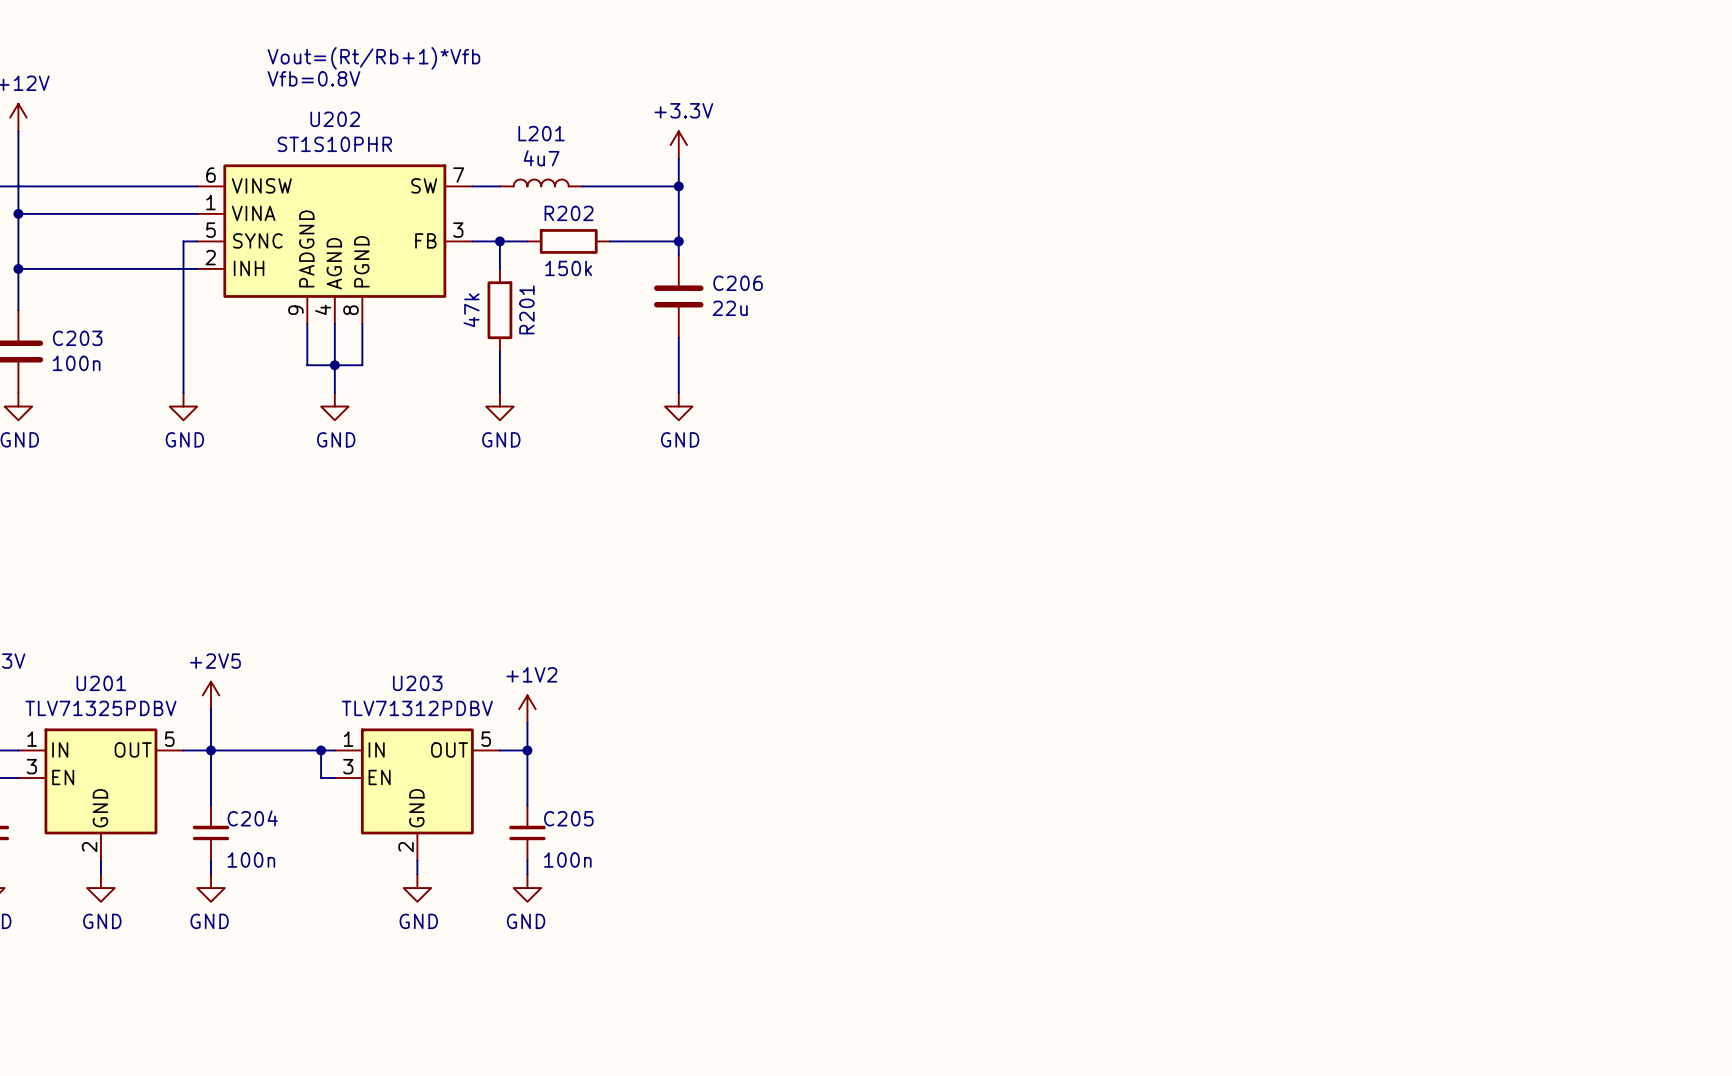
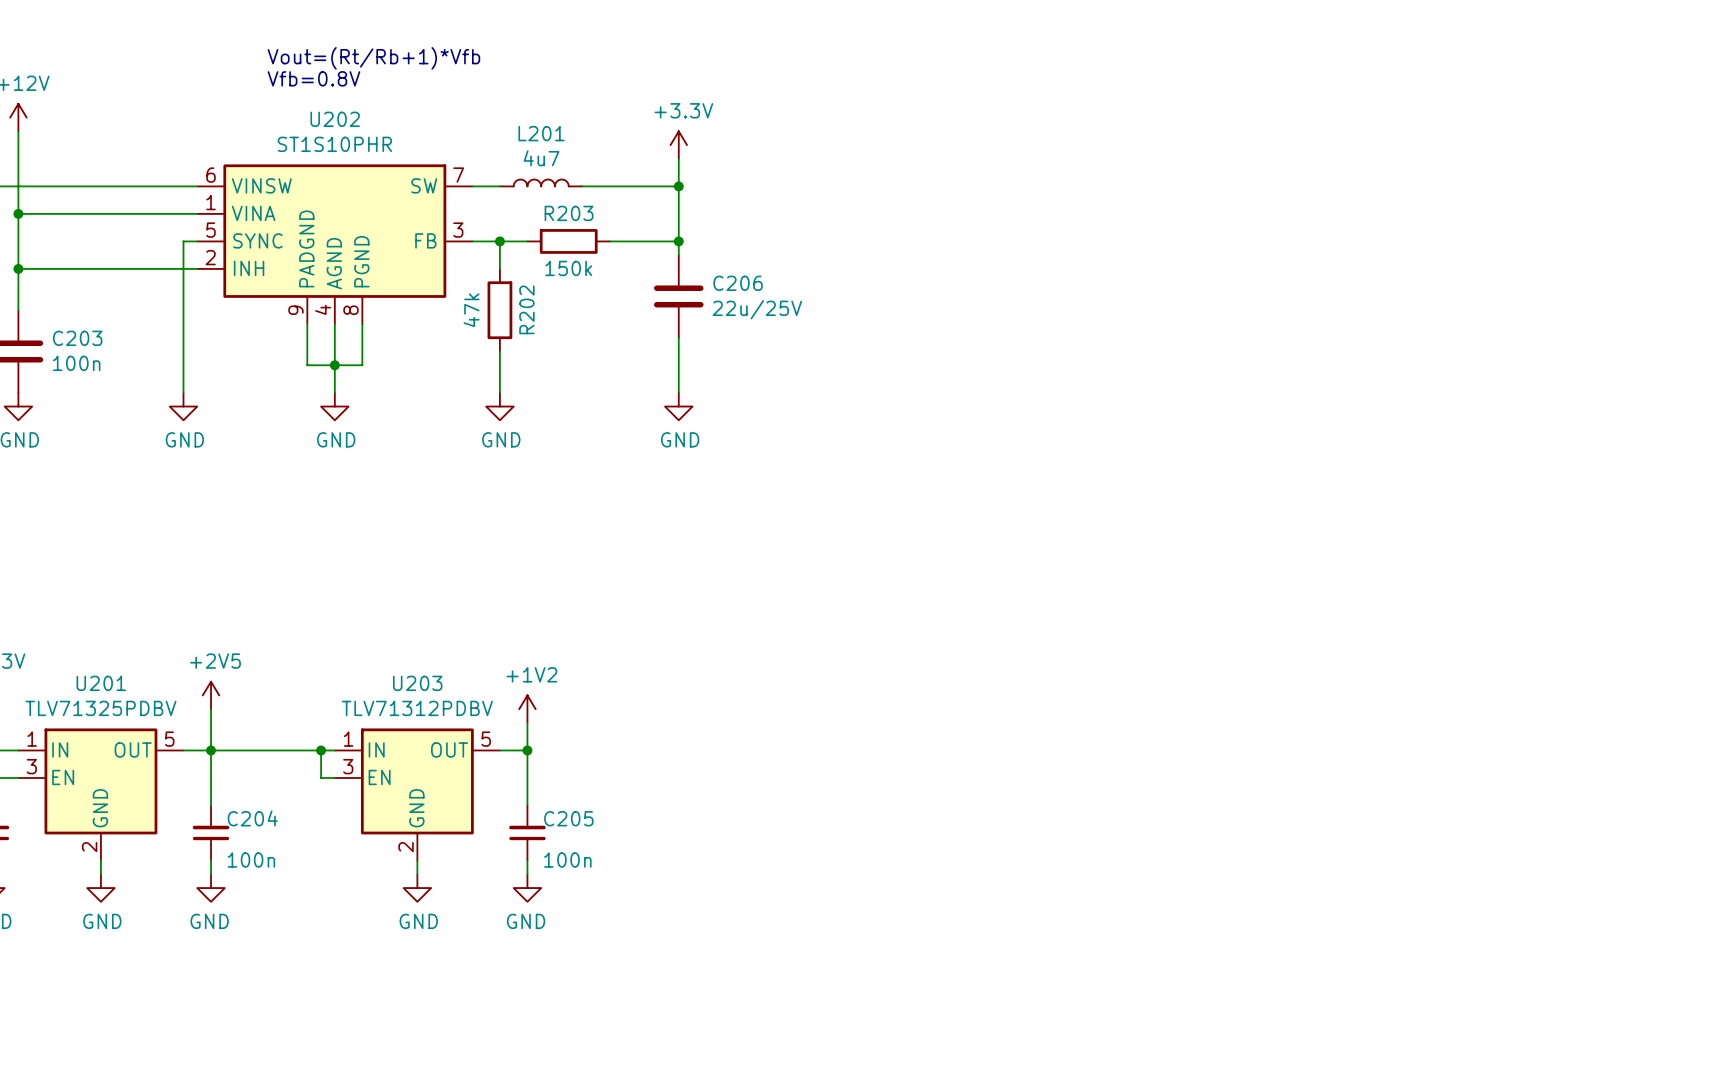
R202 name: R202 (569, 213) -> R203 (569, 213)
C206 value: 22u (730, 308) -> 22u/25V (757, 309)
R201 name: R201 (526, 309) -> R202 (526, 309)

